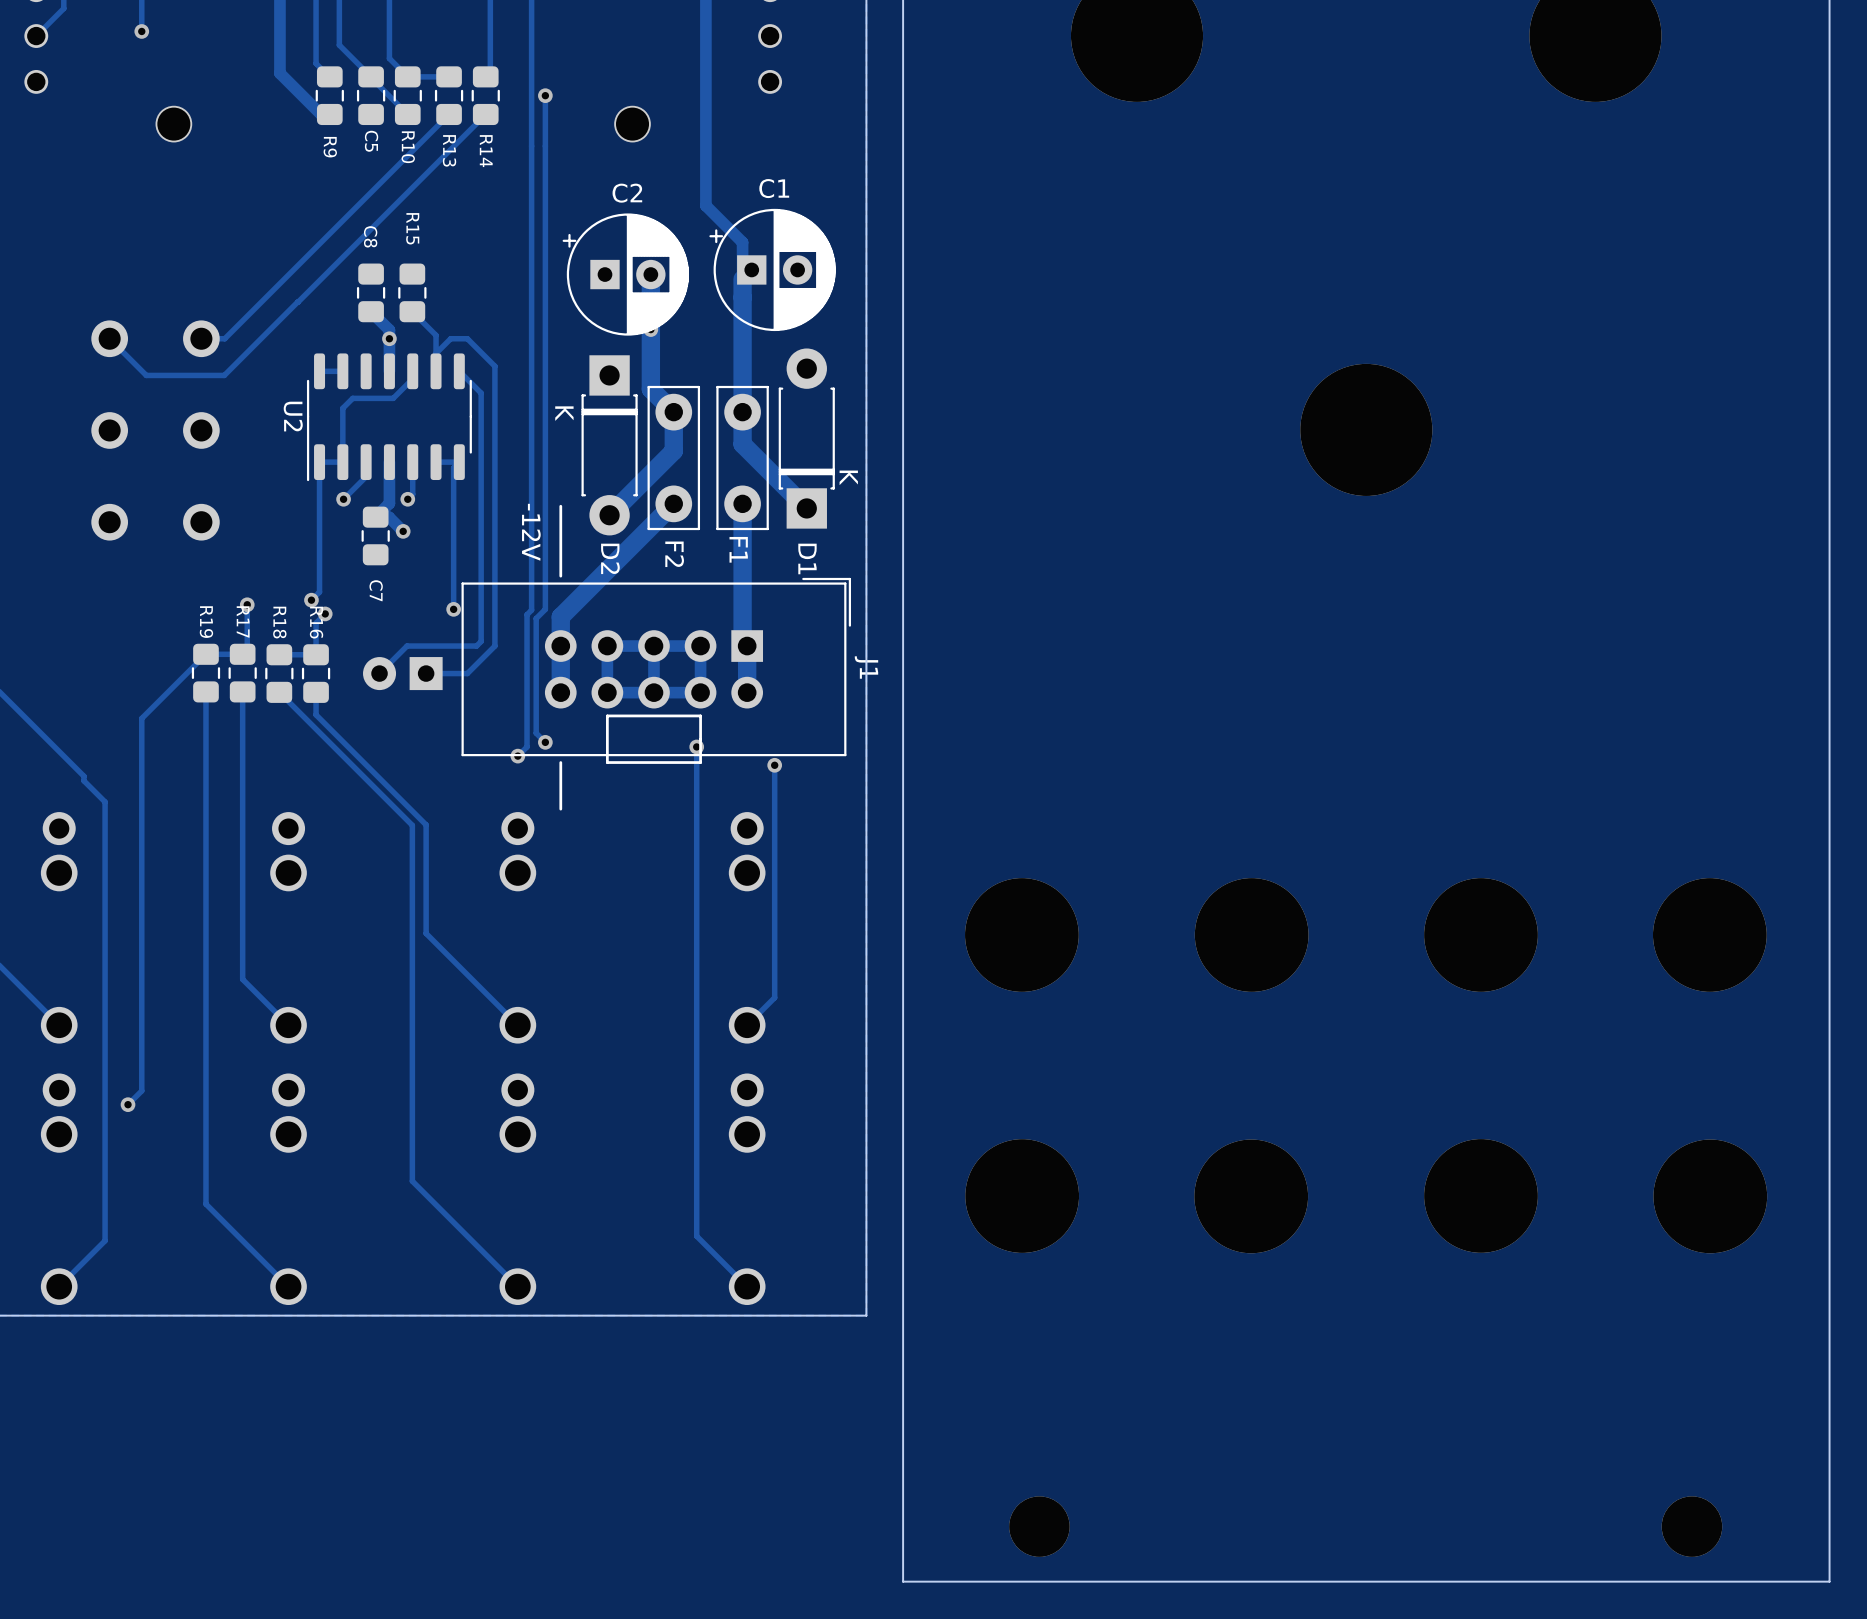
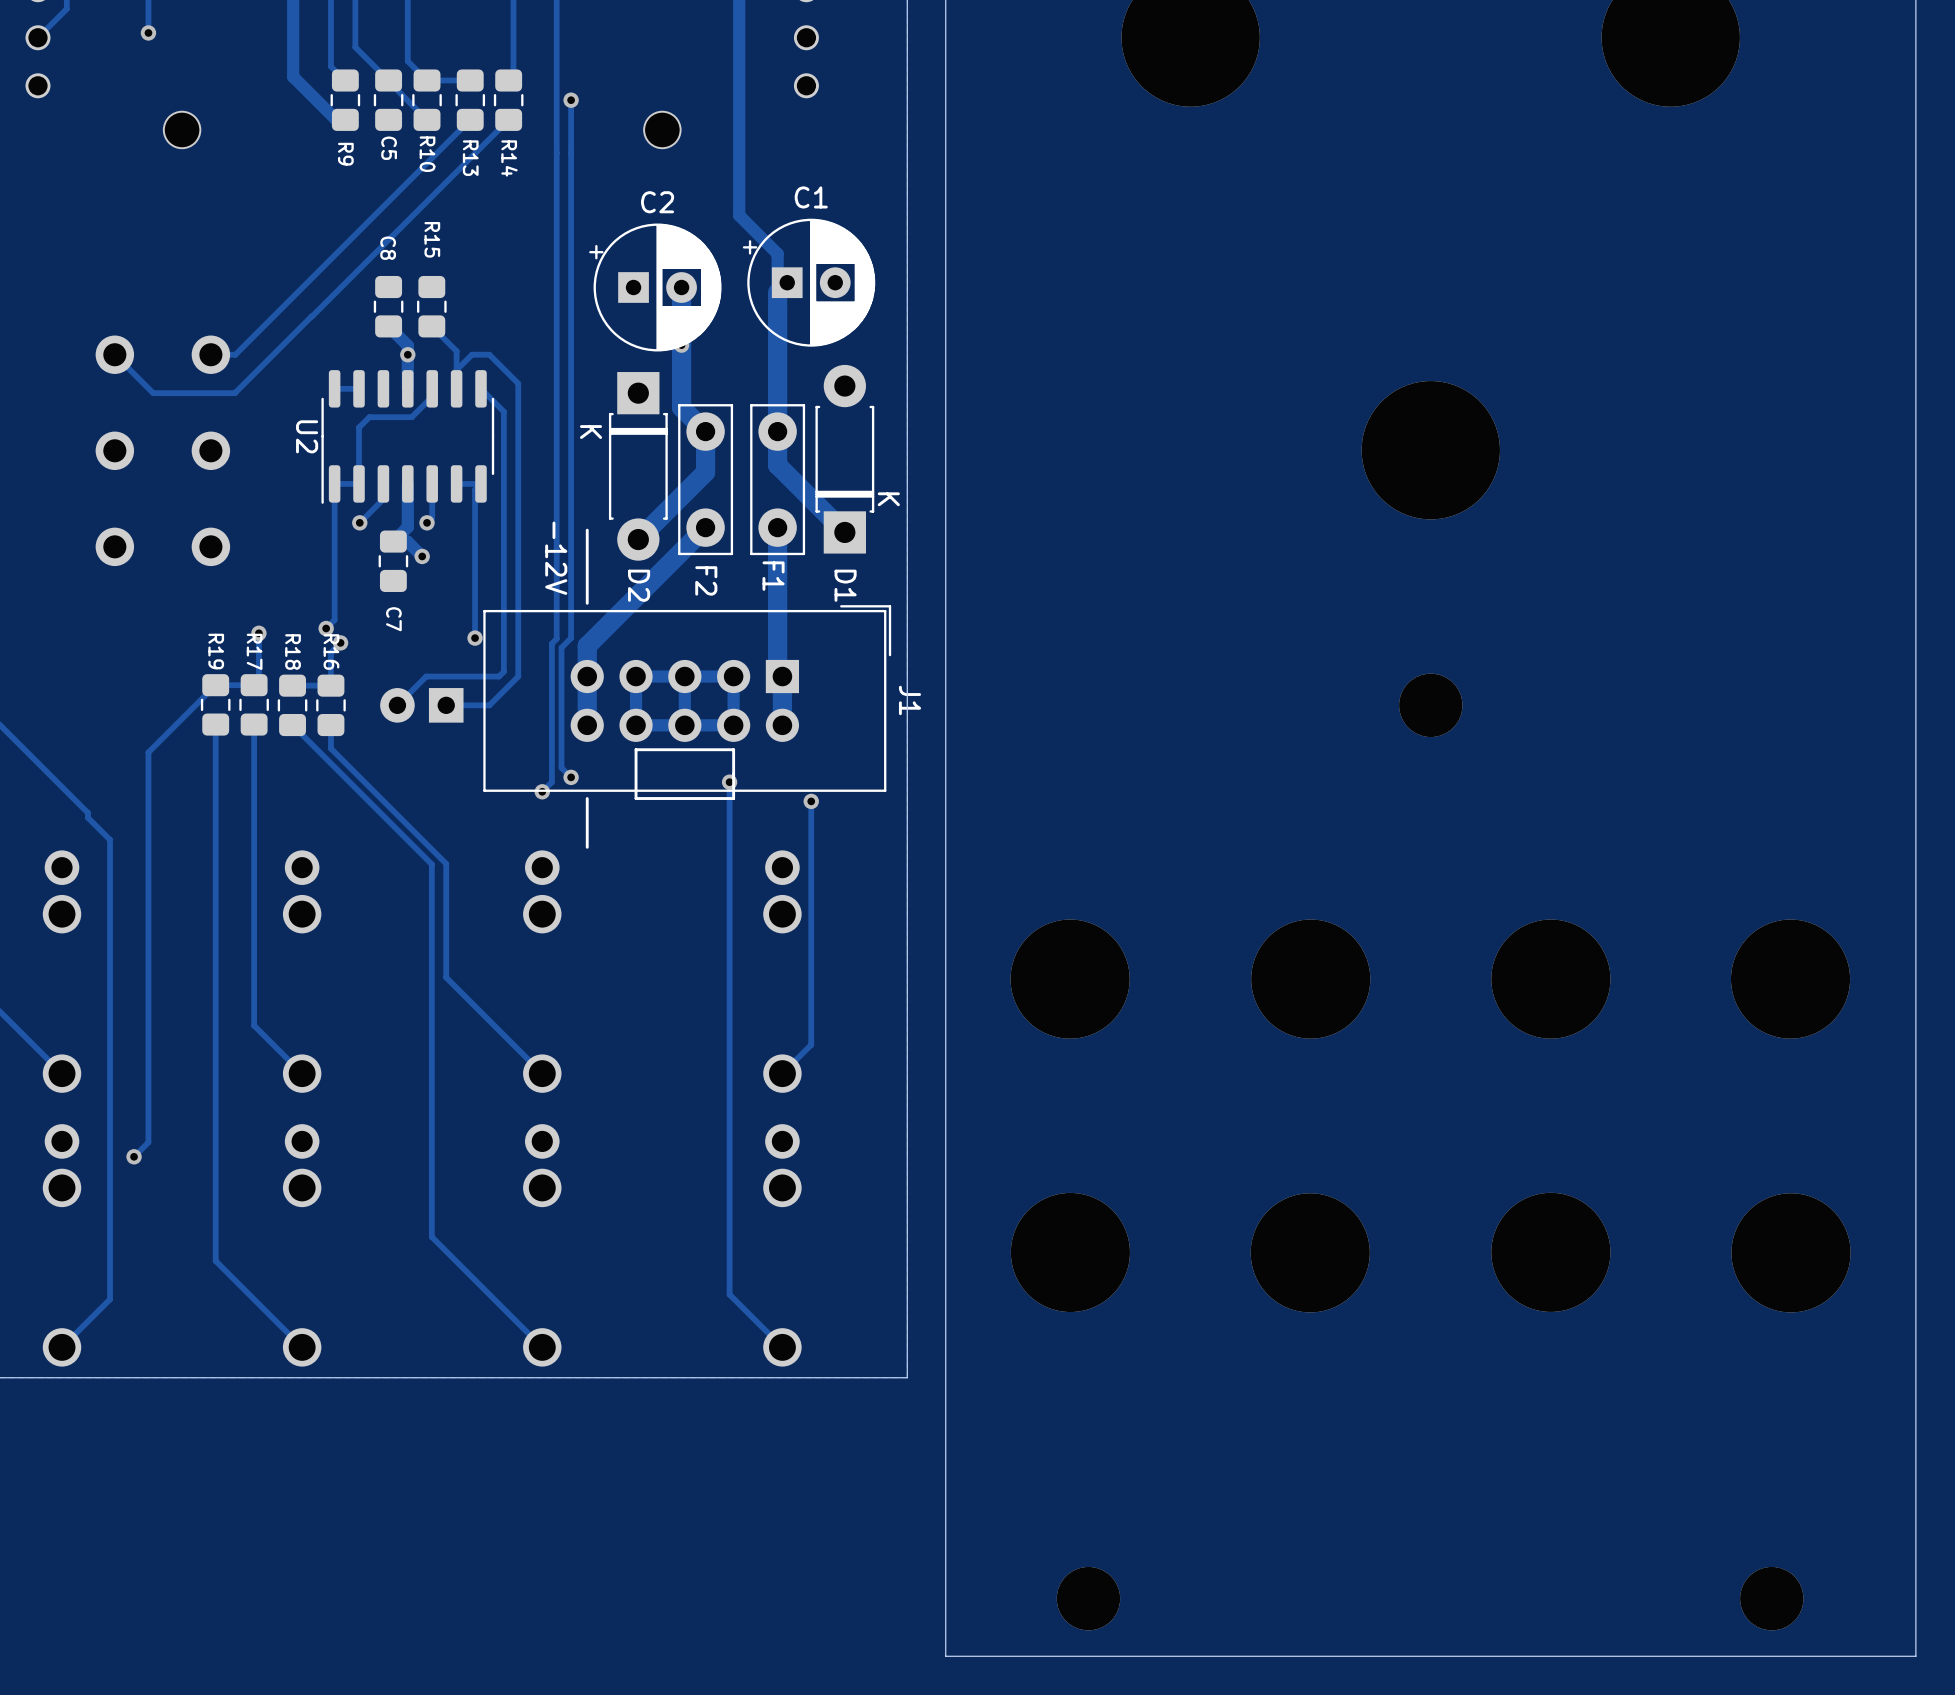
part: none -> (1430, 705)

